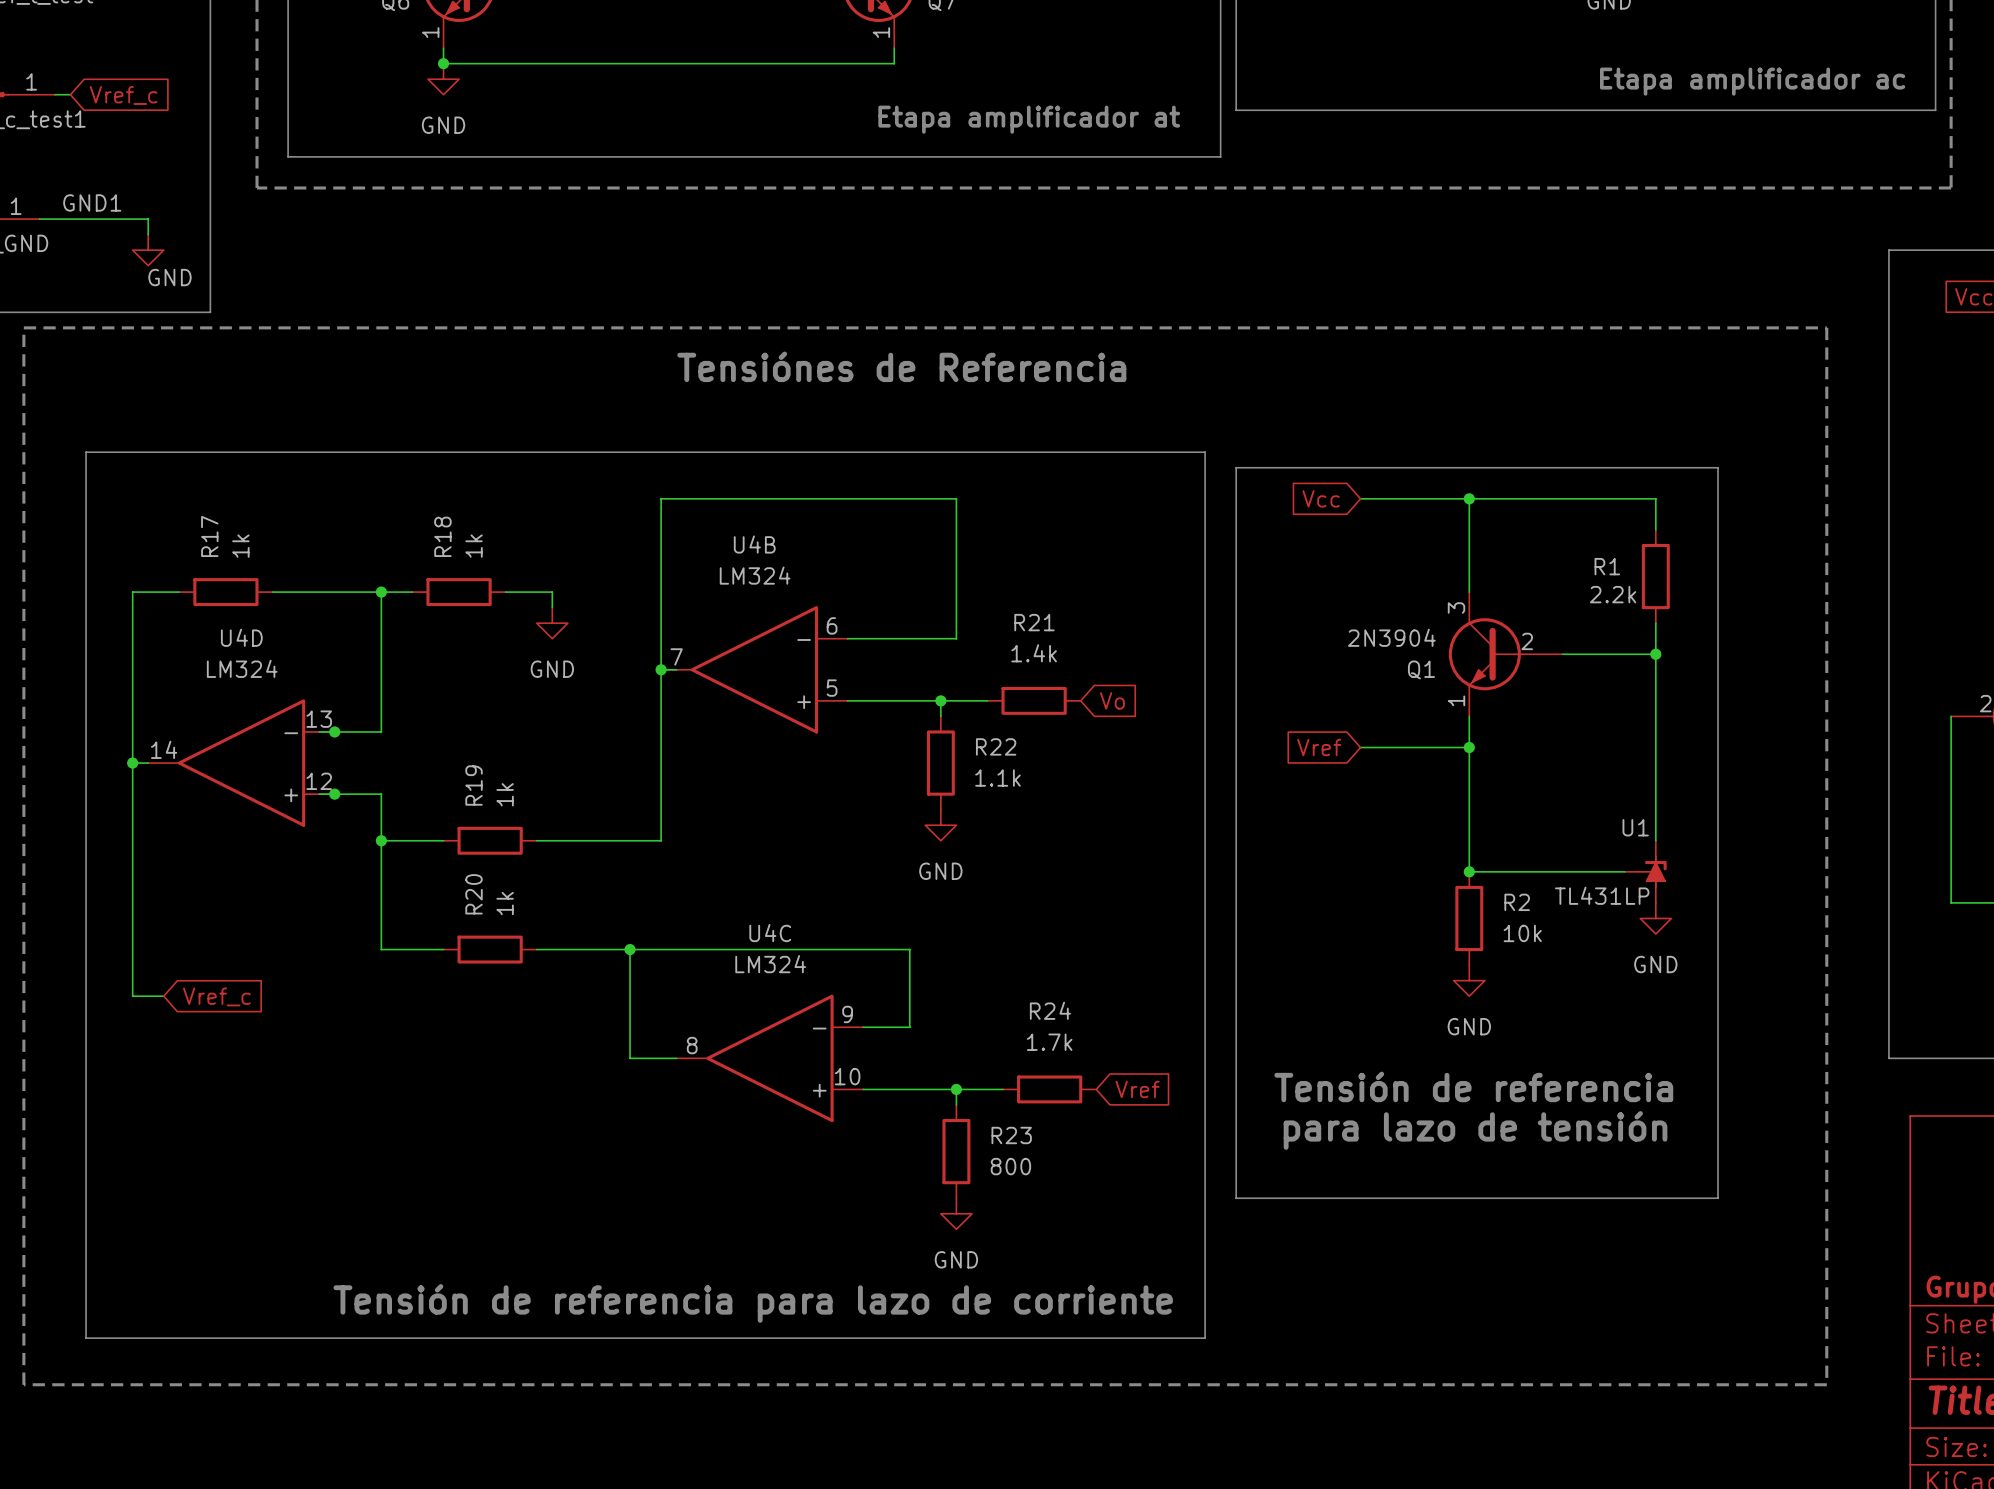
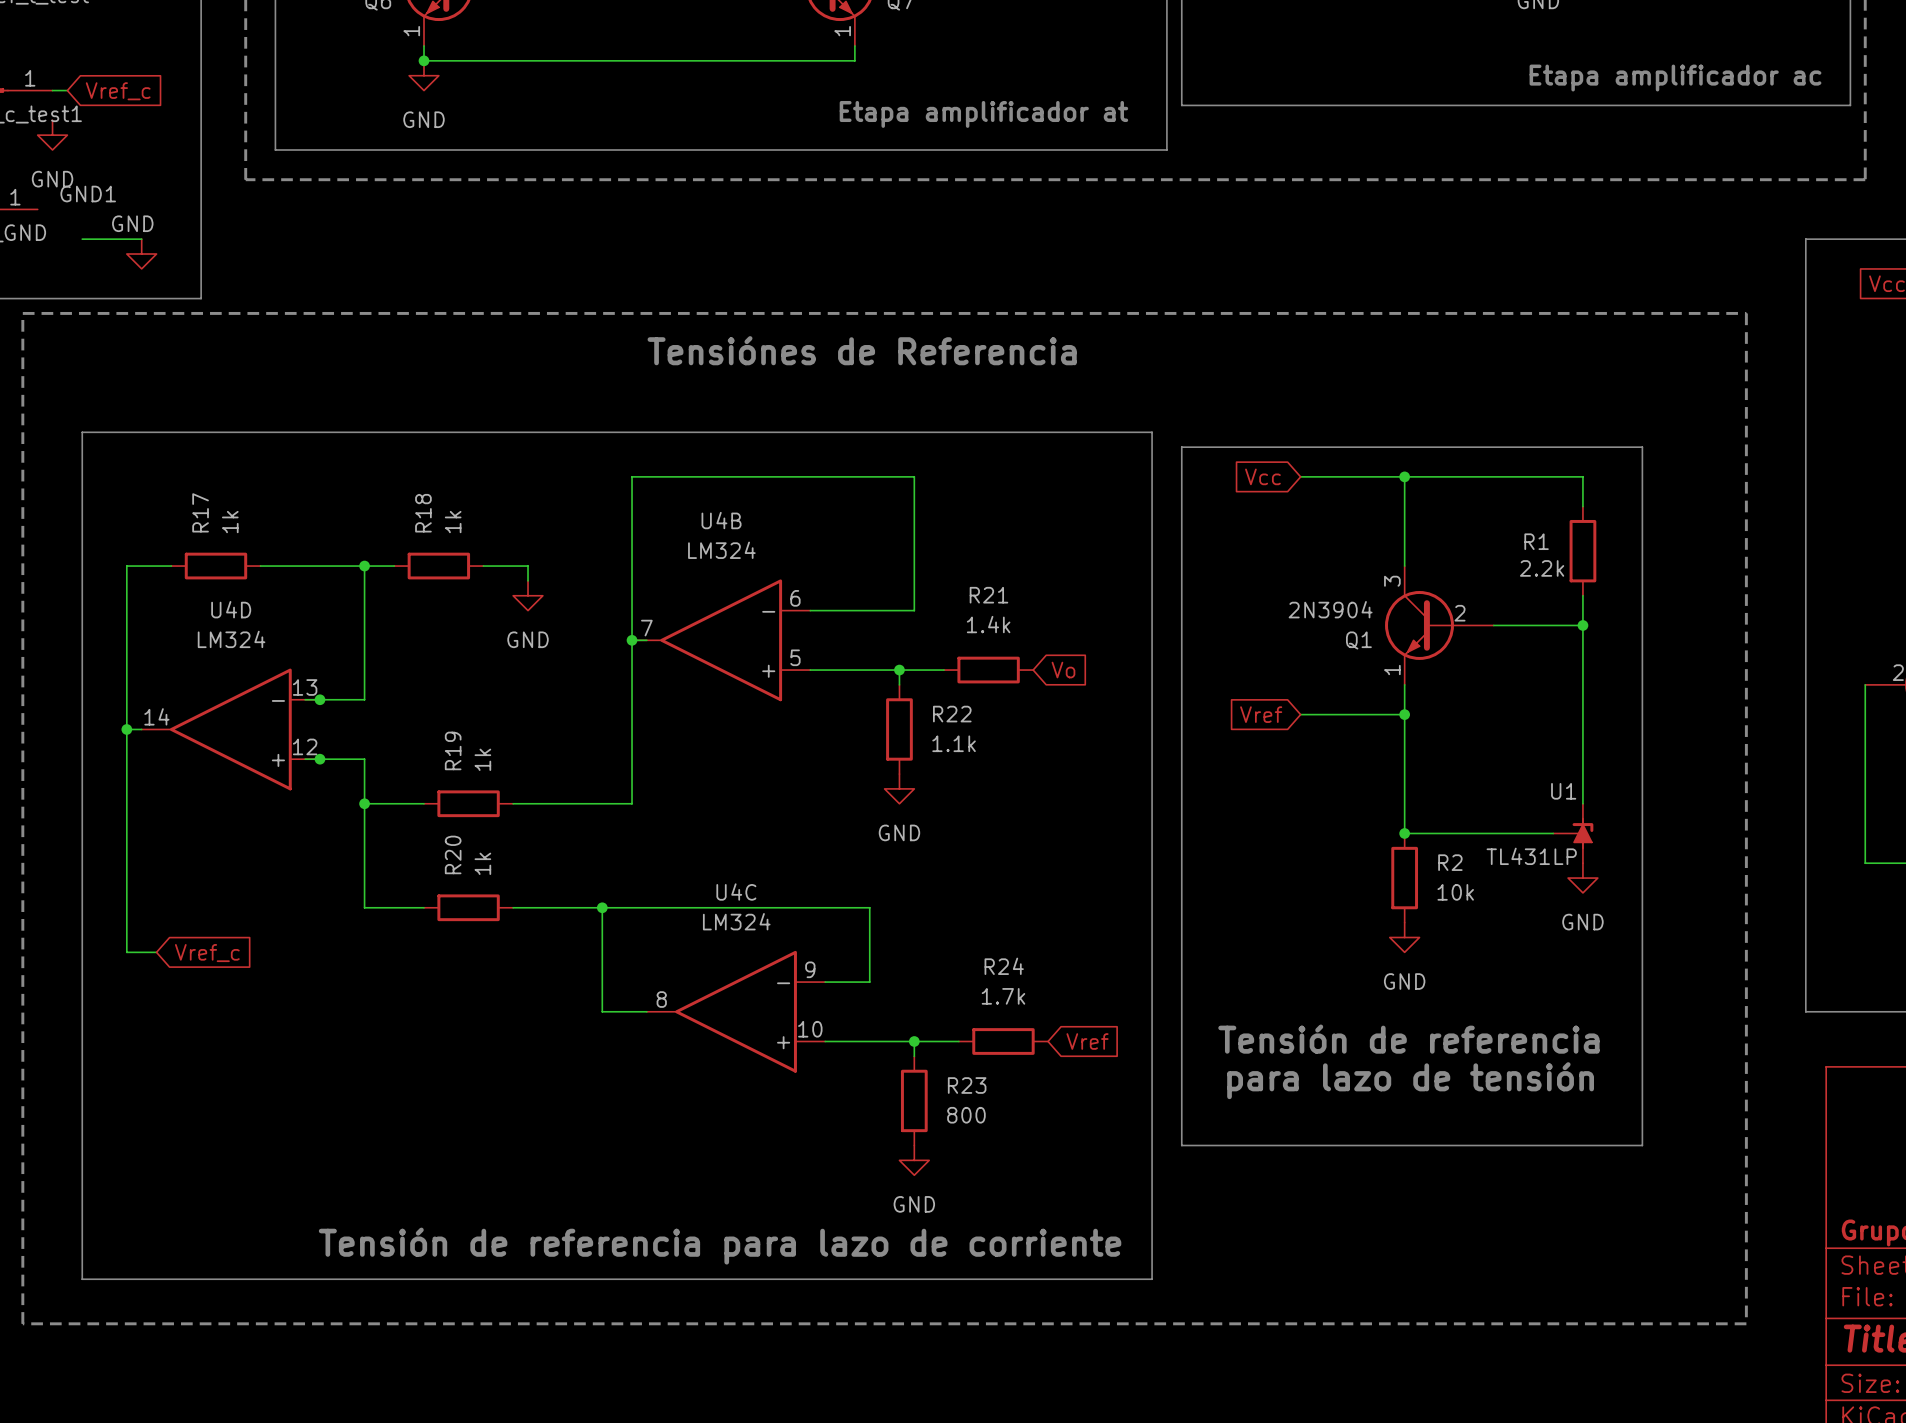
power symbol: none -> GND (52, 135)
wire: (39, 219) (148, 219) (148, 234) -> none
wire: none -> (82, 239) (141, 239)
power symbol position: GND (148, 250) -> GND (141, 254)
power symbol text position: GND (169, 277) -> GND (132, 223)

